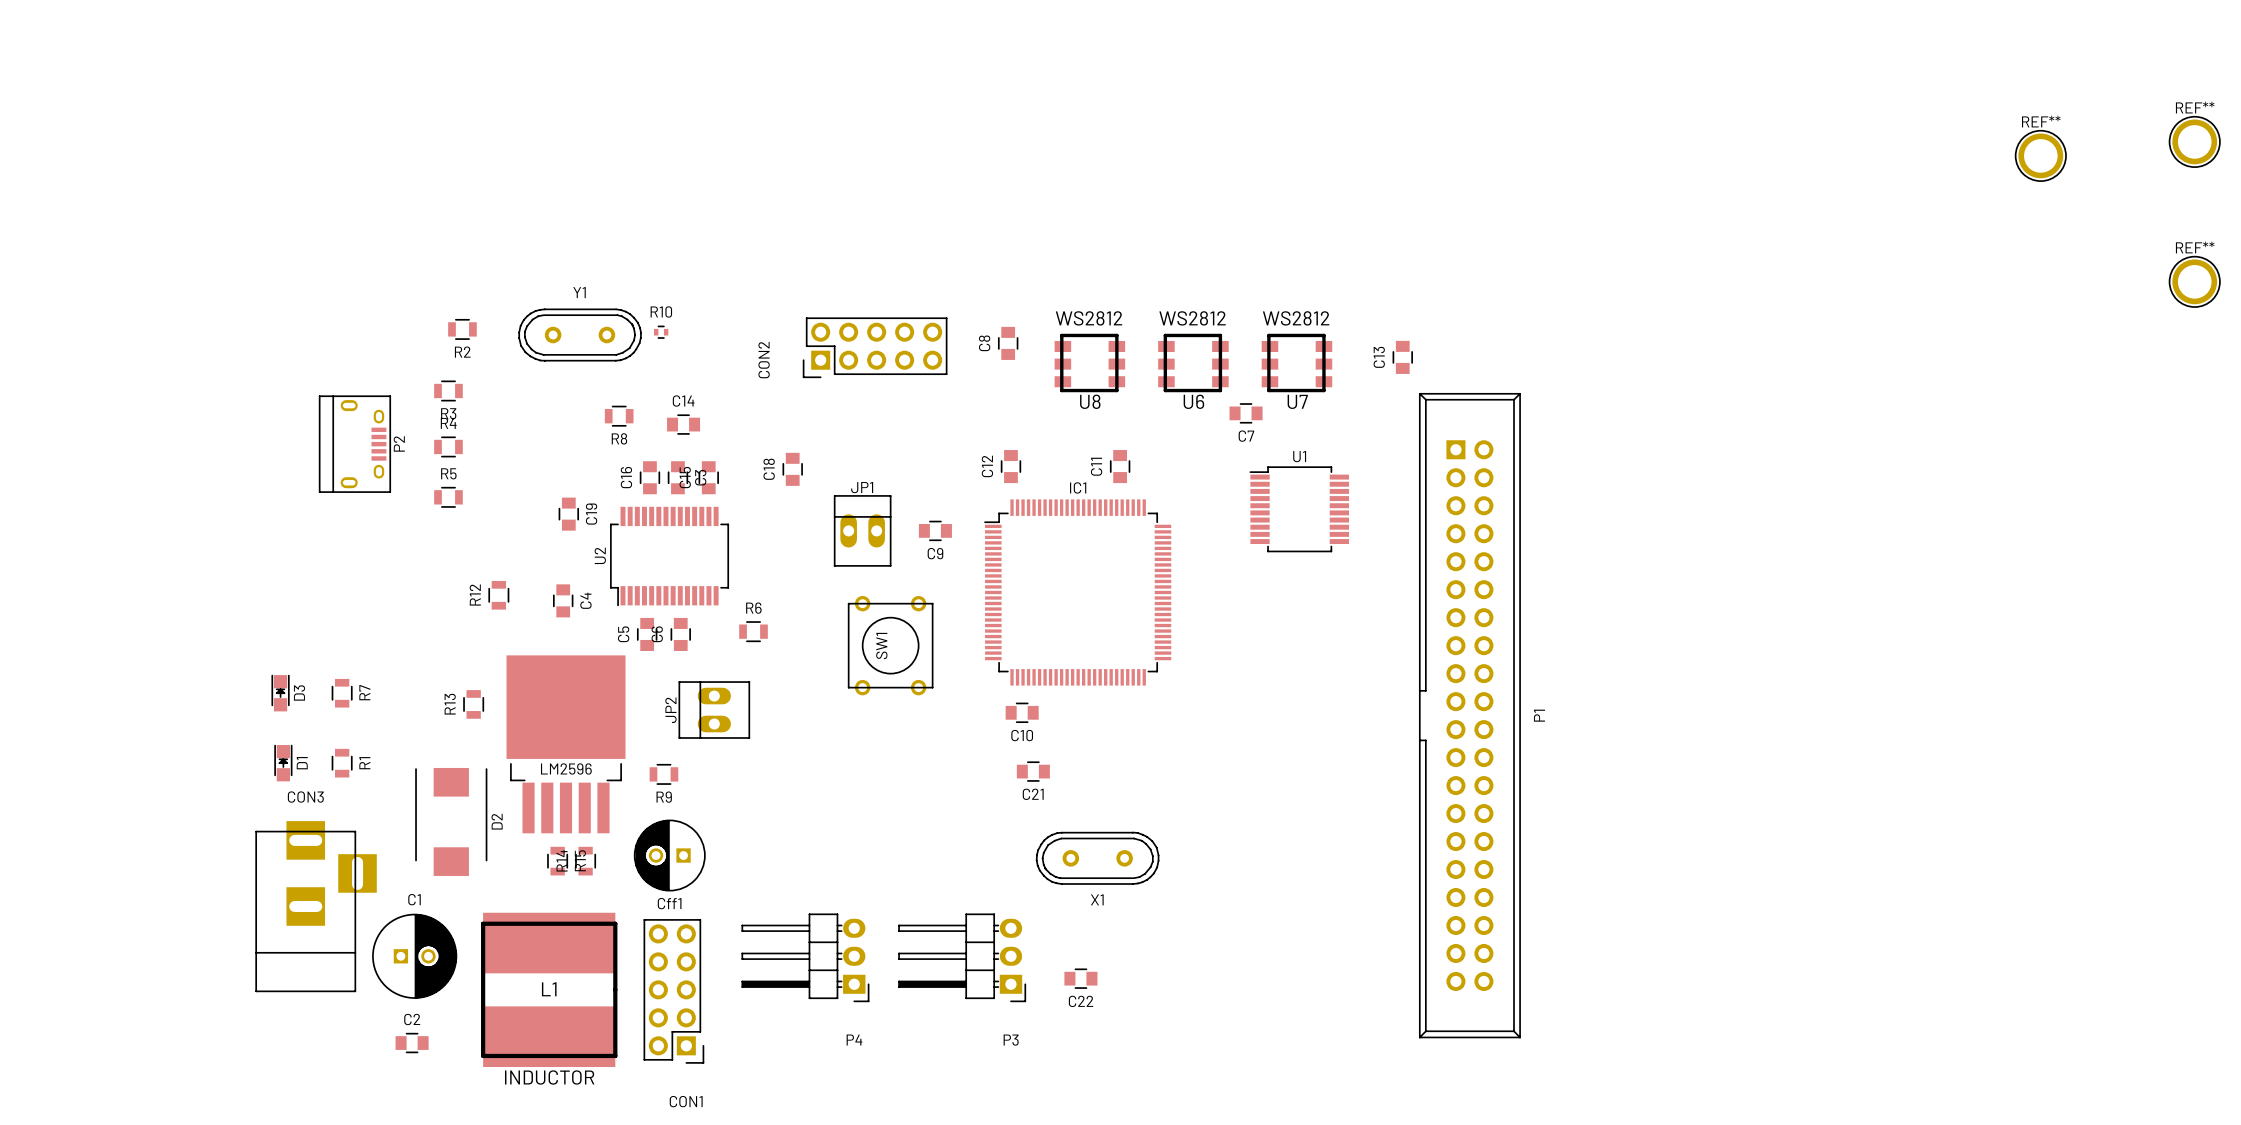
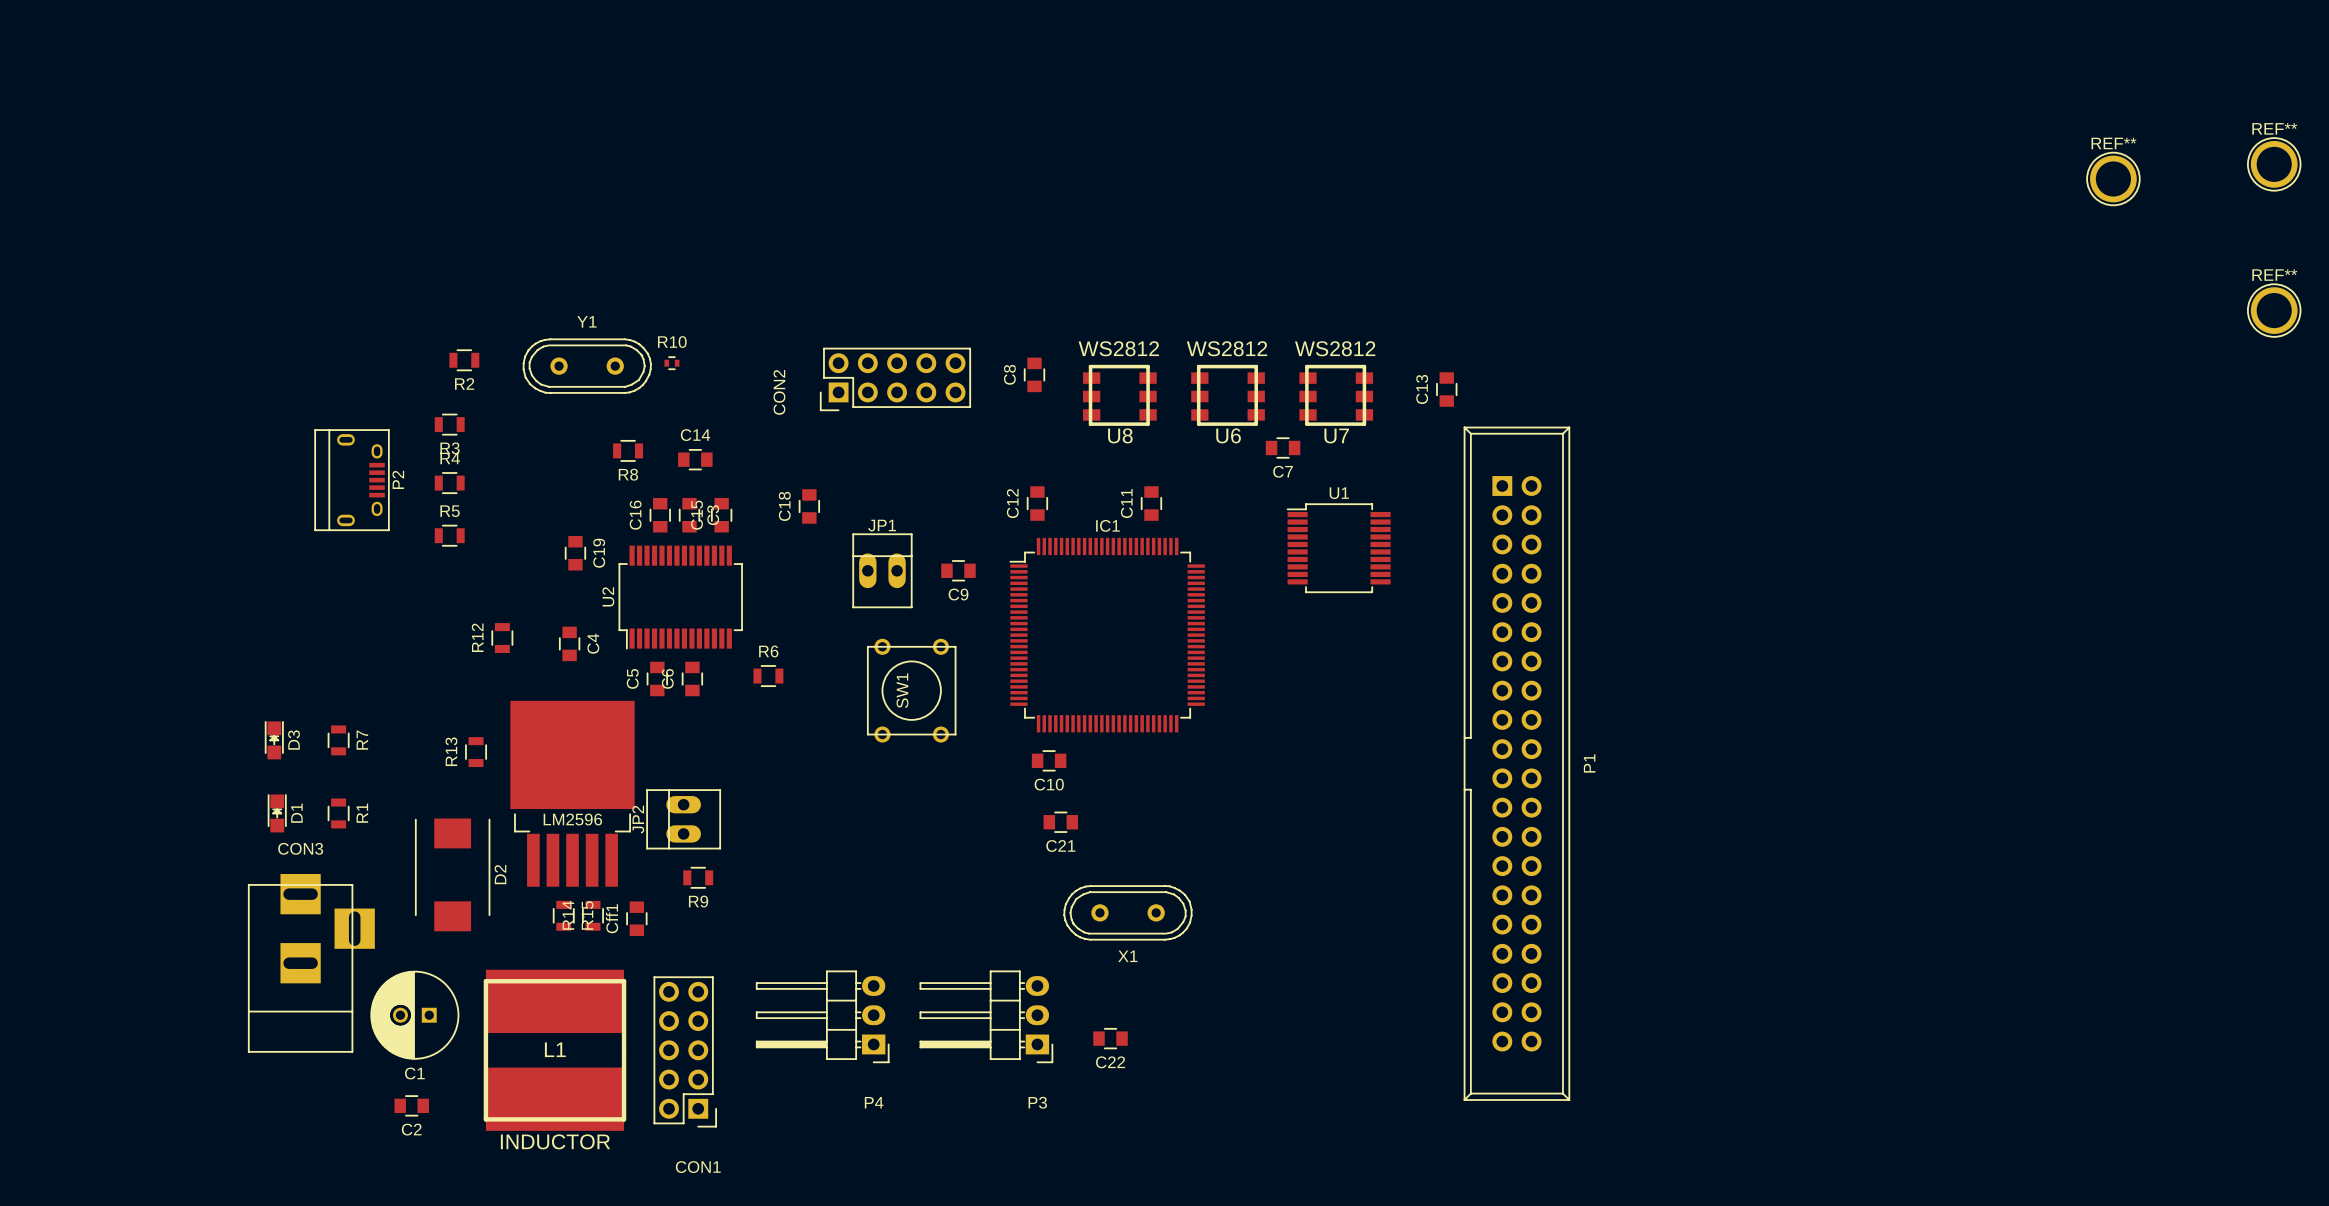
JP2 position: (714, 710) -> (683, 819)
R9 position: (663, 774) -> (698, 877)
Cff1 footprint: [633, 819, 706, 892] -> [626, 901, 648, 937]
Cff1 name position: Cff1 (669, 903) -> Cff1 (612, 918)
C1 rotation: 0° (414, 956) -> 180° (414, 1015)
C2 name position: C2 (412, 1019) -> C2 (411, 1129)

